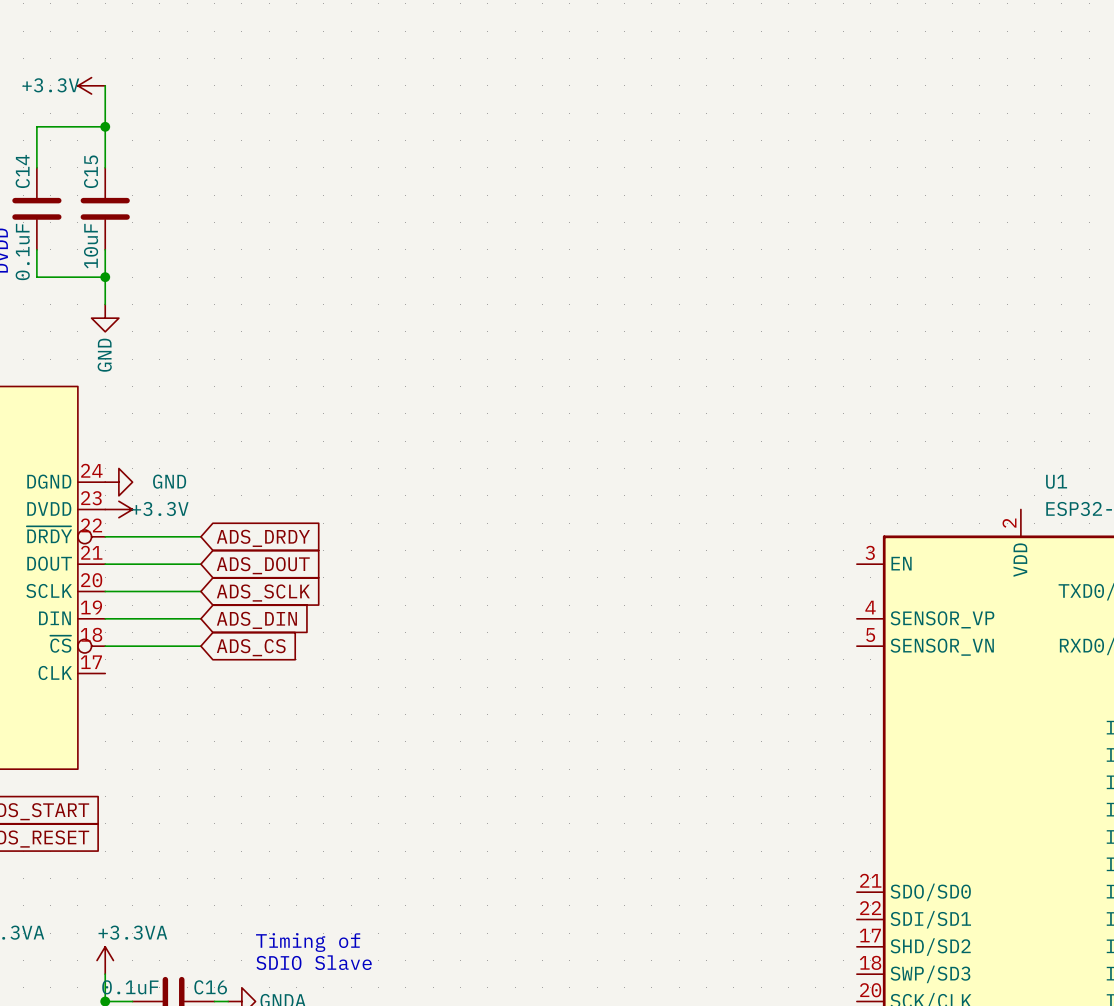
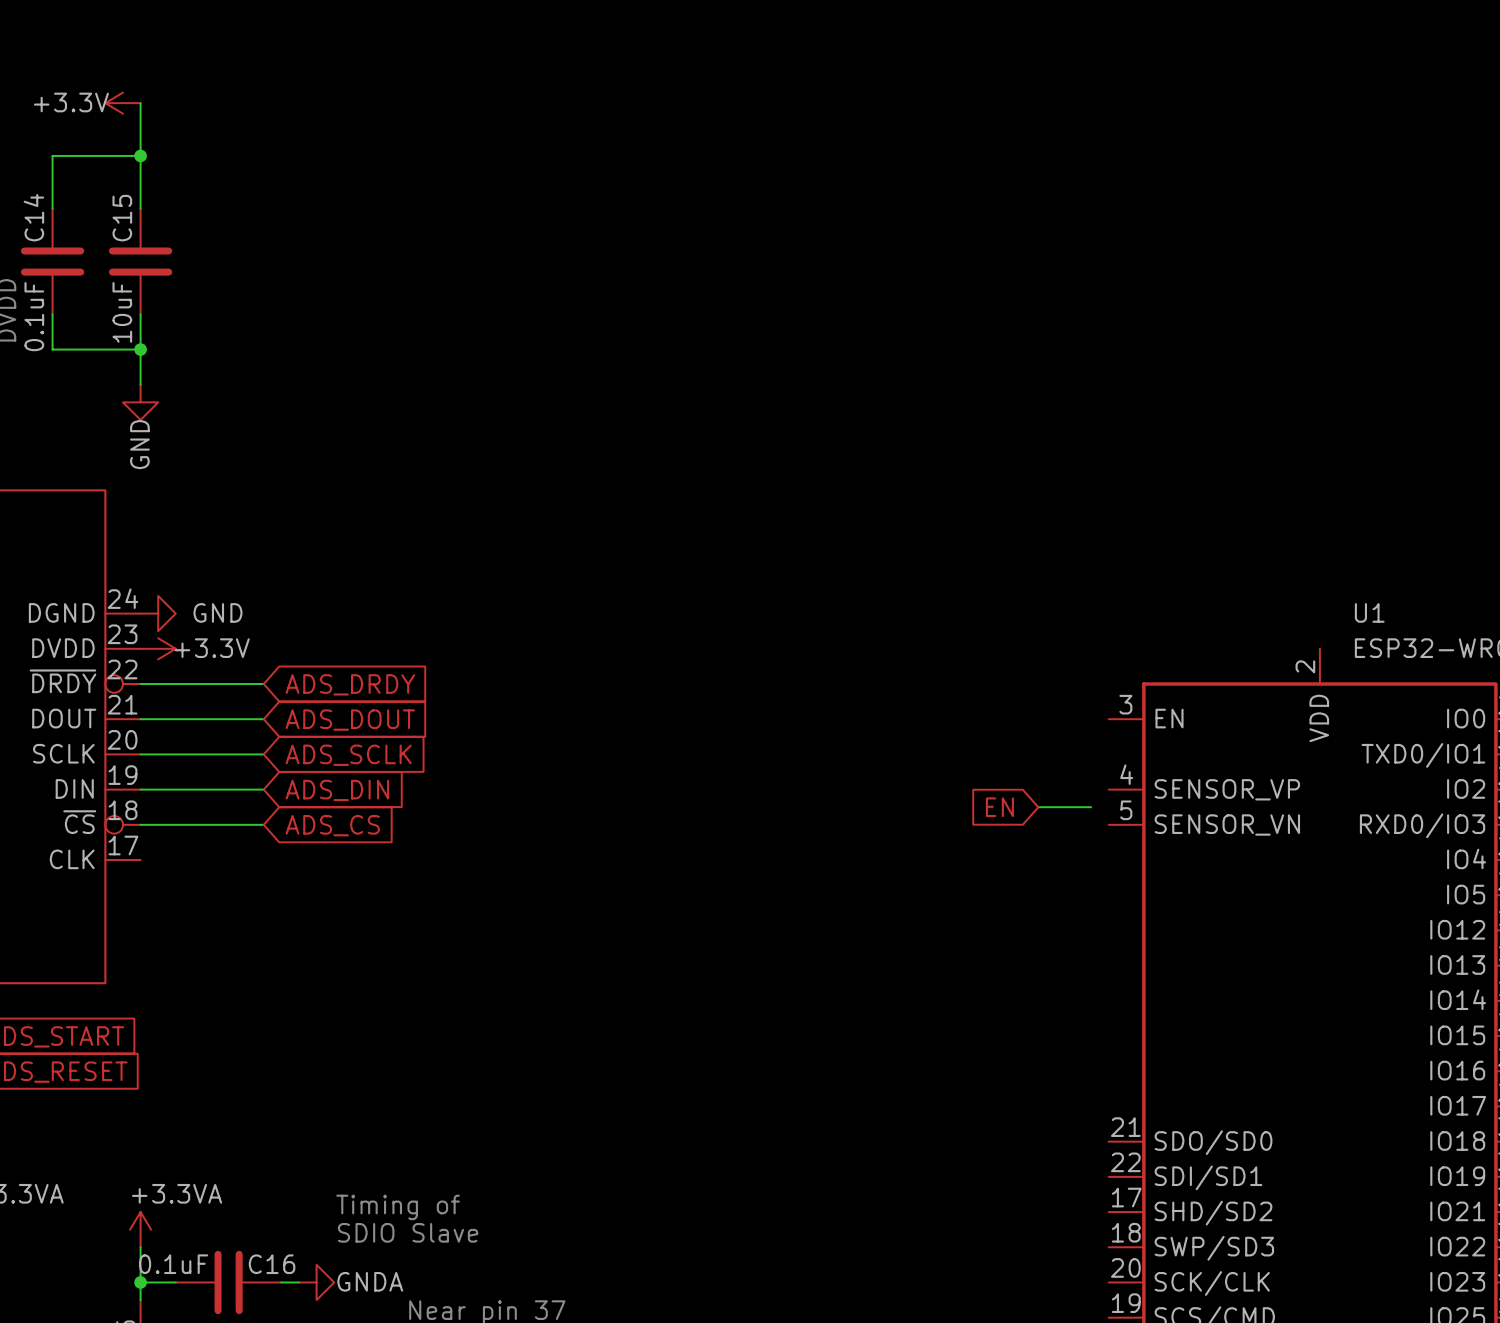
global label: none -> EN (999, 807)
wire: none -> (1038, 807) (1091, 807)

